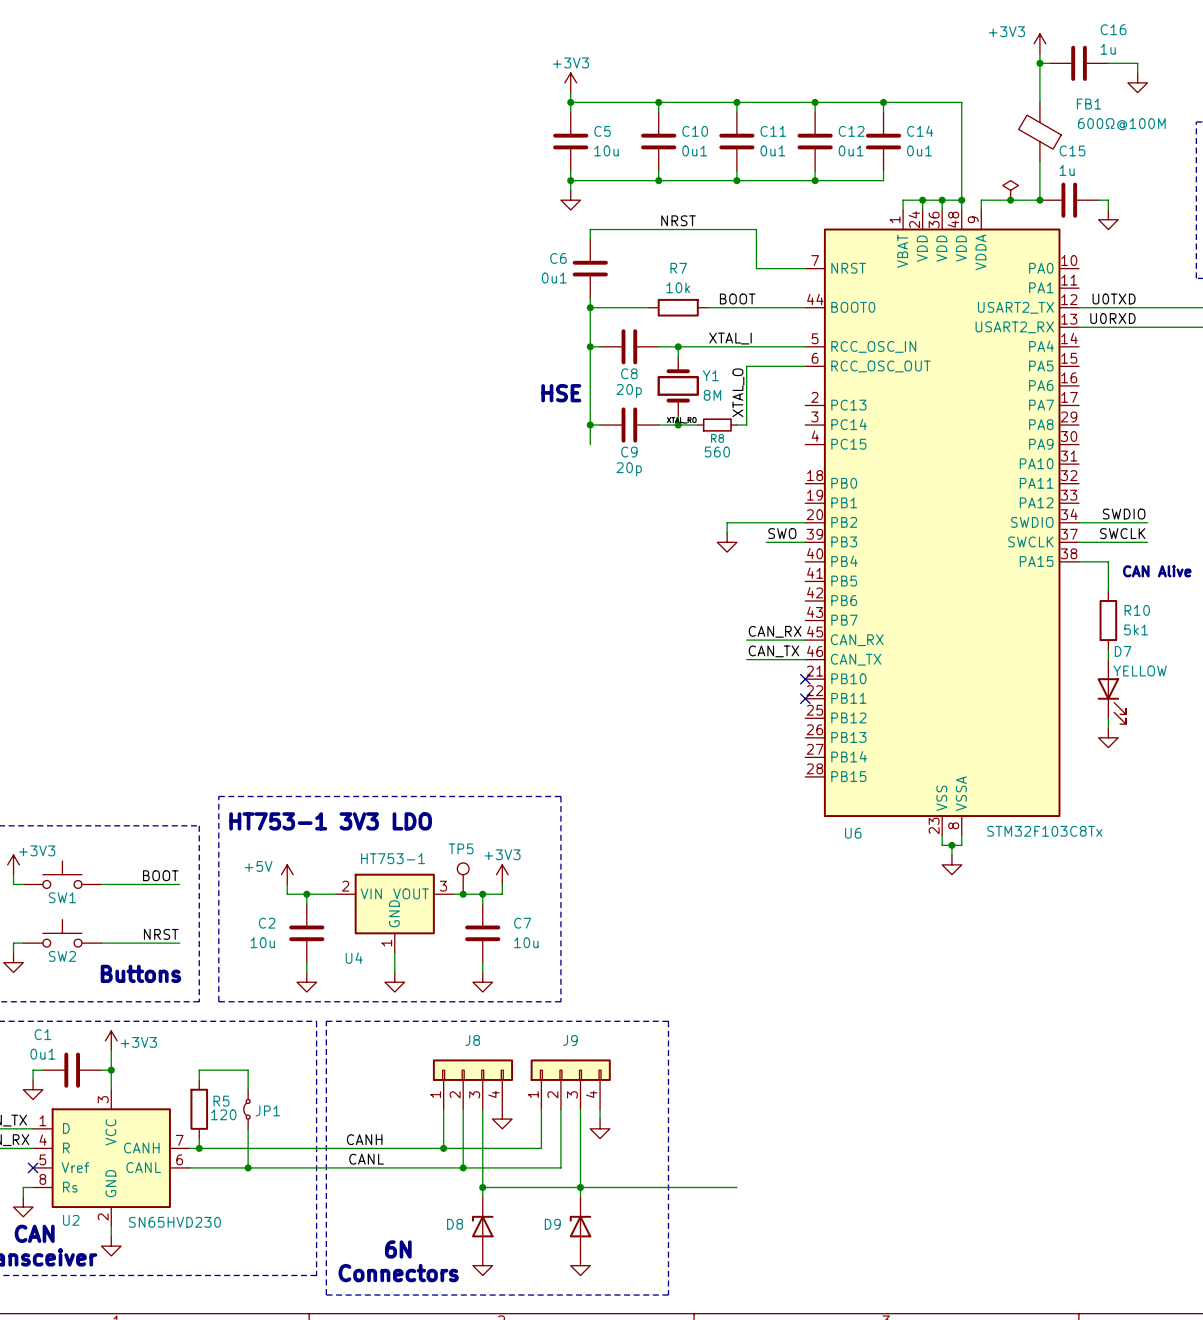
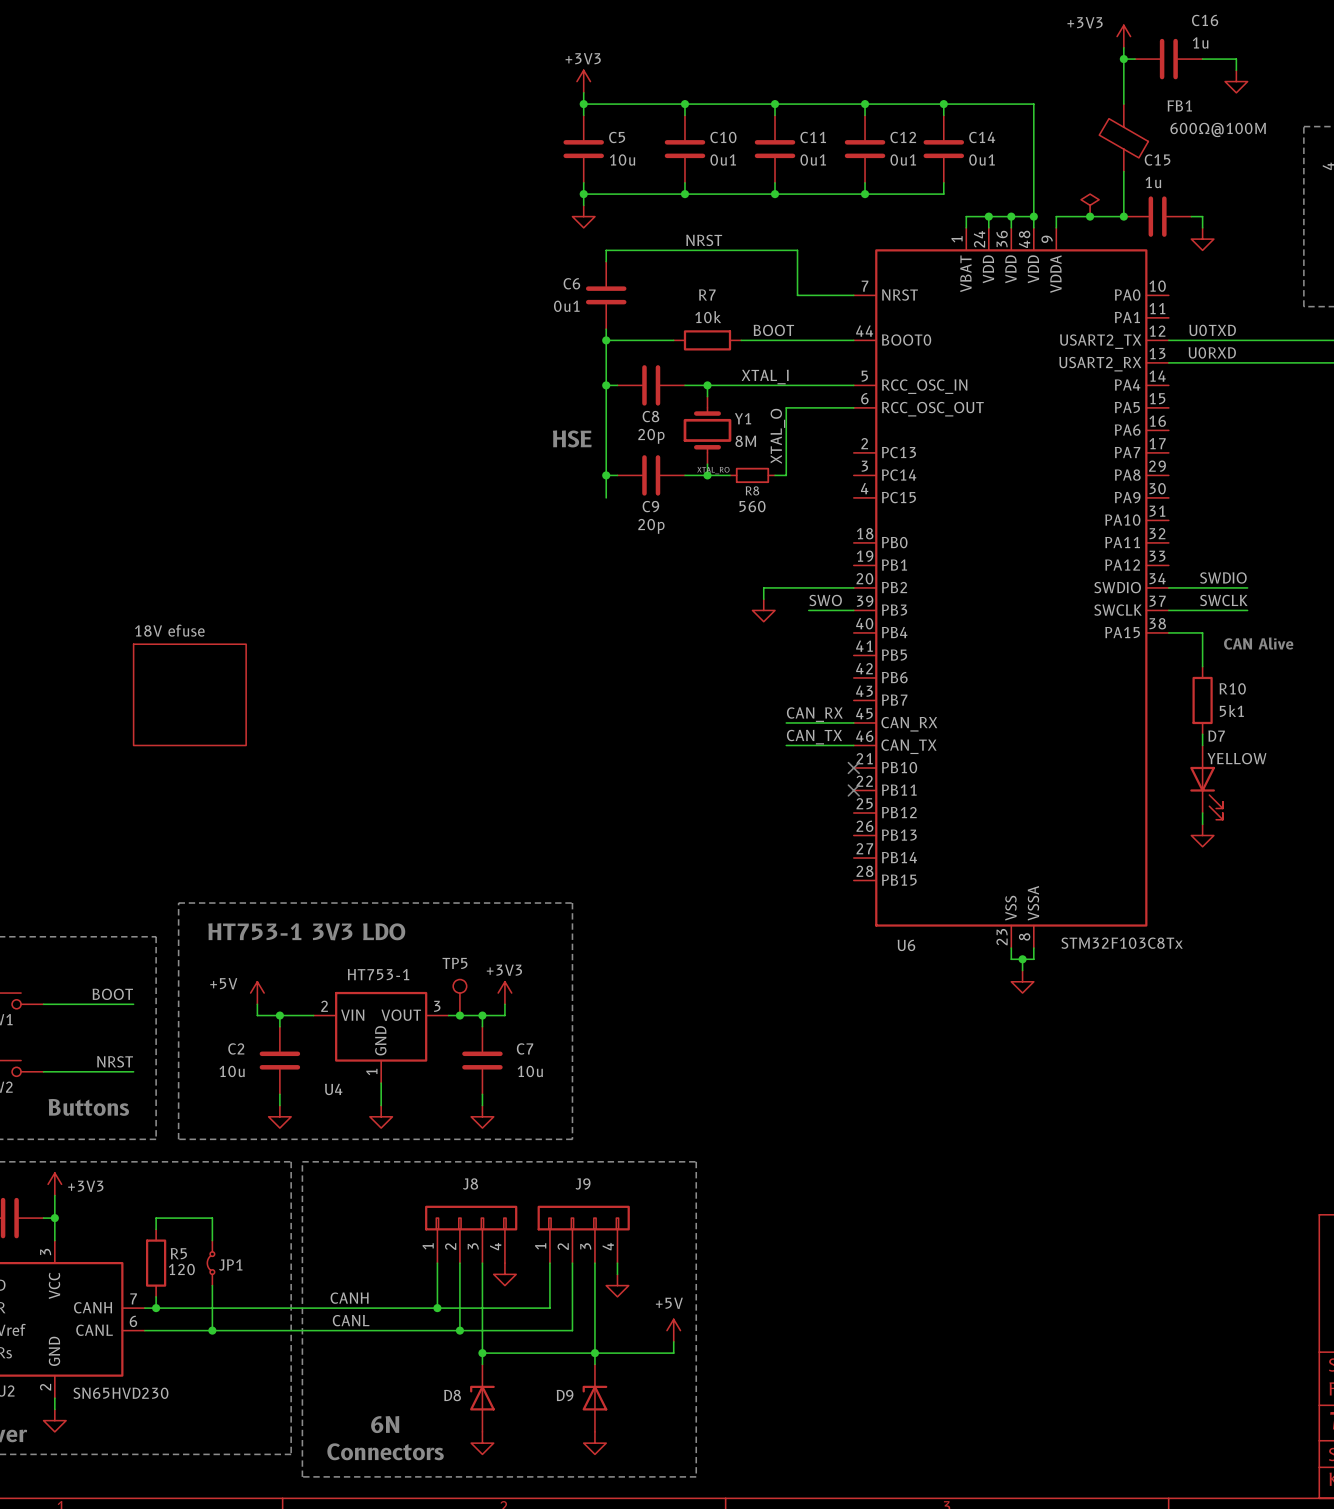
sheet 18V efuse: none -> (189, 694)
power symbol: none -> +5V (673, 1330)
wire: (648, 1187) (736, 1187) -> (673, 1353) (673, 1341)

